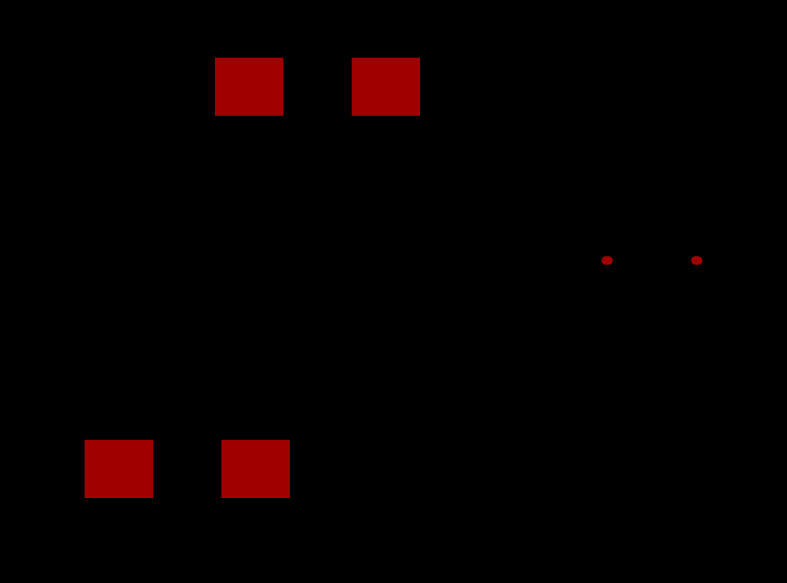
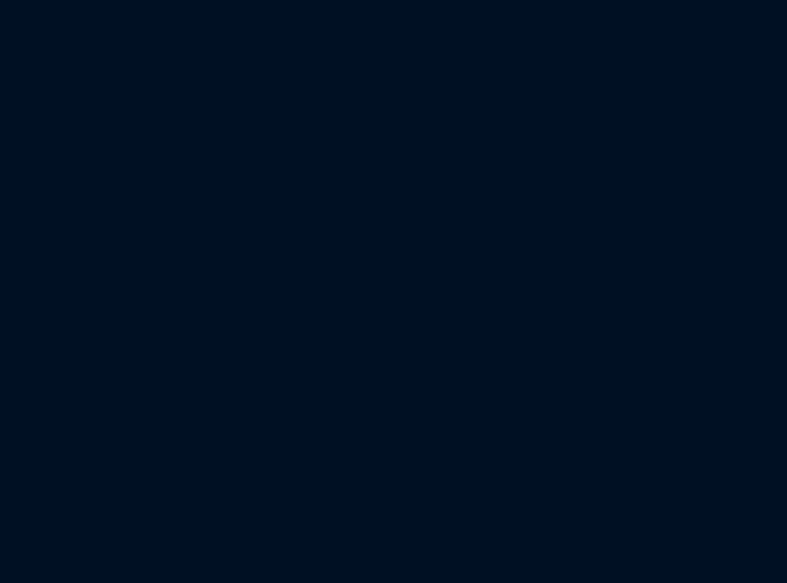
part: (317, 86) -> none
top track: (608, 260) (605, 260) -> none
top track: (698, 260) (695, 260) -> none
part: (187, 468) -> none

